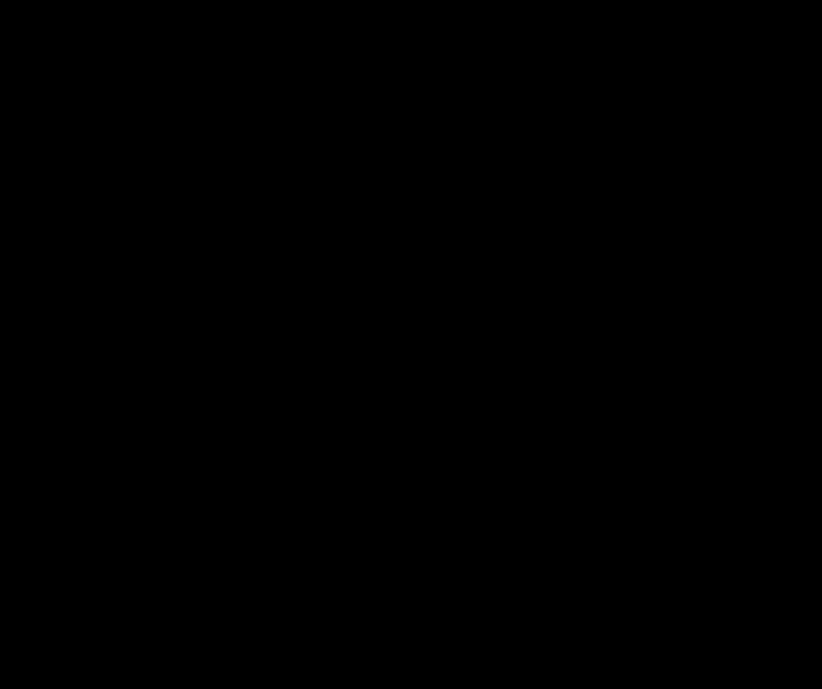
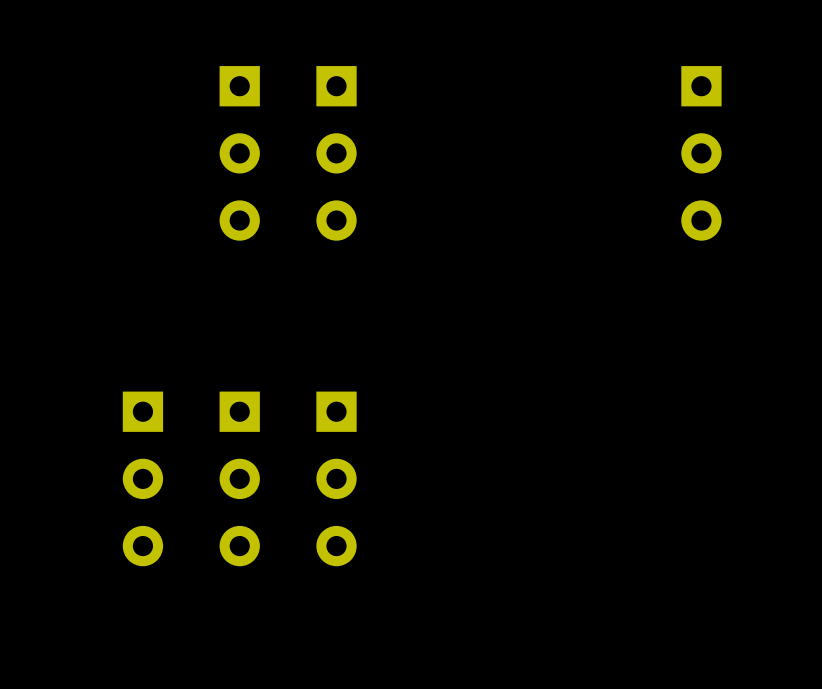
part: none -> (239, 153)
part: none -> (336, 153)
part: none -> (701, 153)
part: none -> (142, 478)
part: none -> (239, 478)
part: none -> (336, 478)

